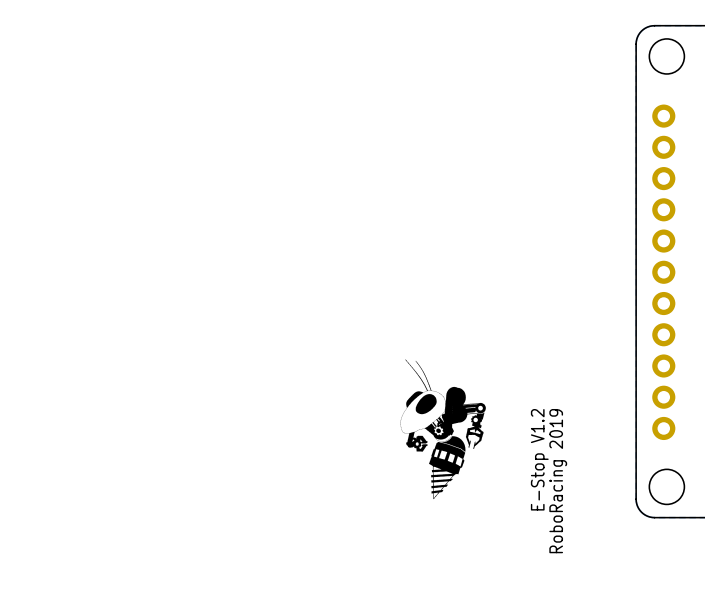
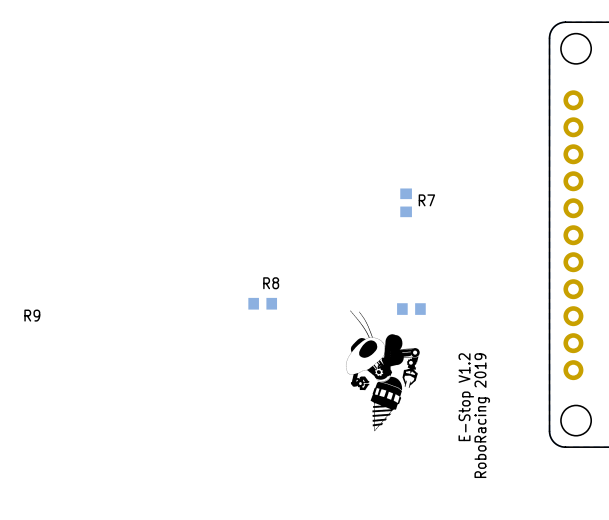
R7: none -> (406, 202)
R8: none -> (262, 303)
R9: none -> (411, 309)

